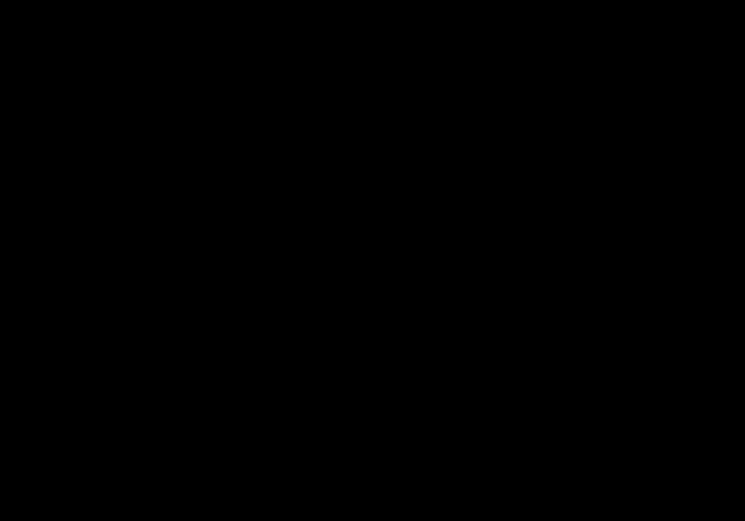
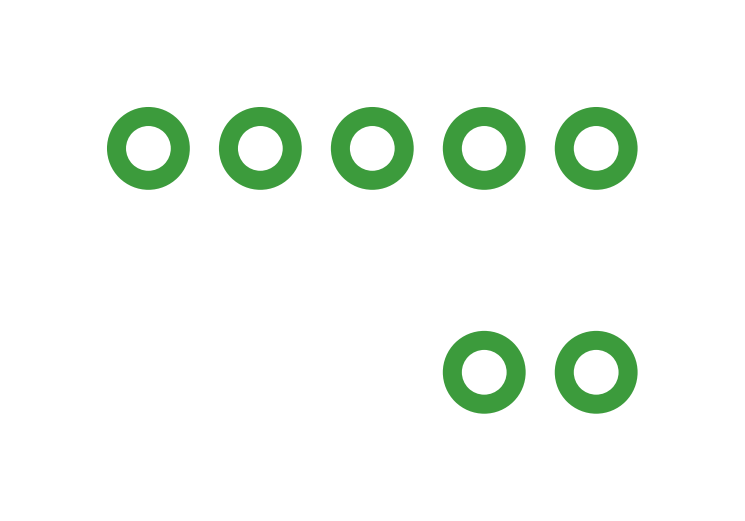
part: none -> (372, 148)
part: none -> (540, 372)

